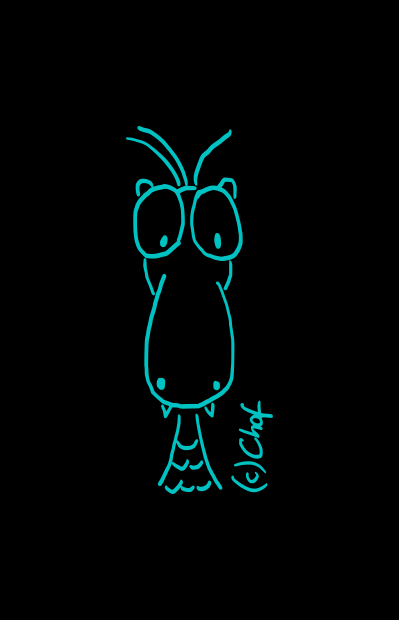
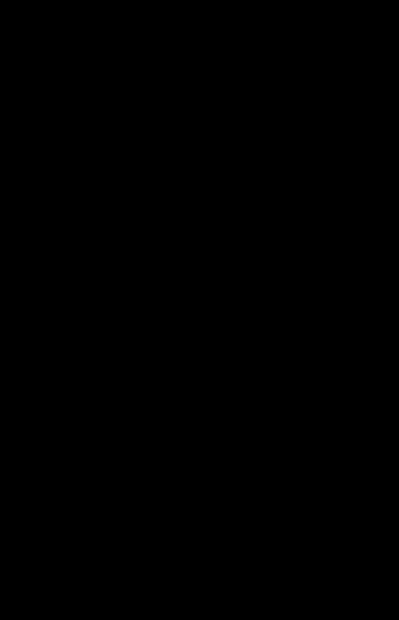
drawing: [125, 125, 273, 494] -> none

